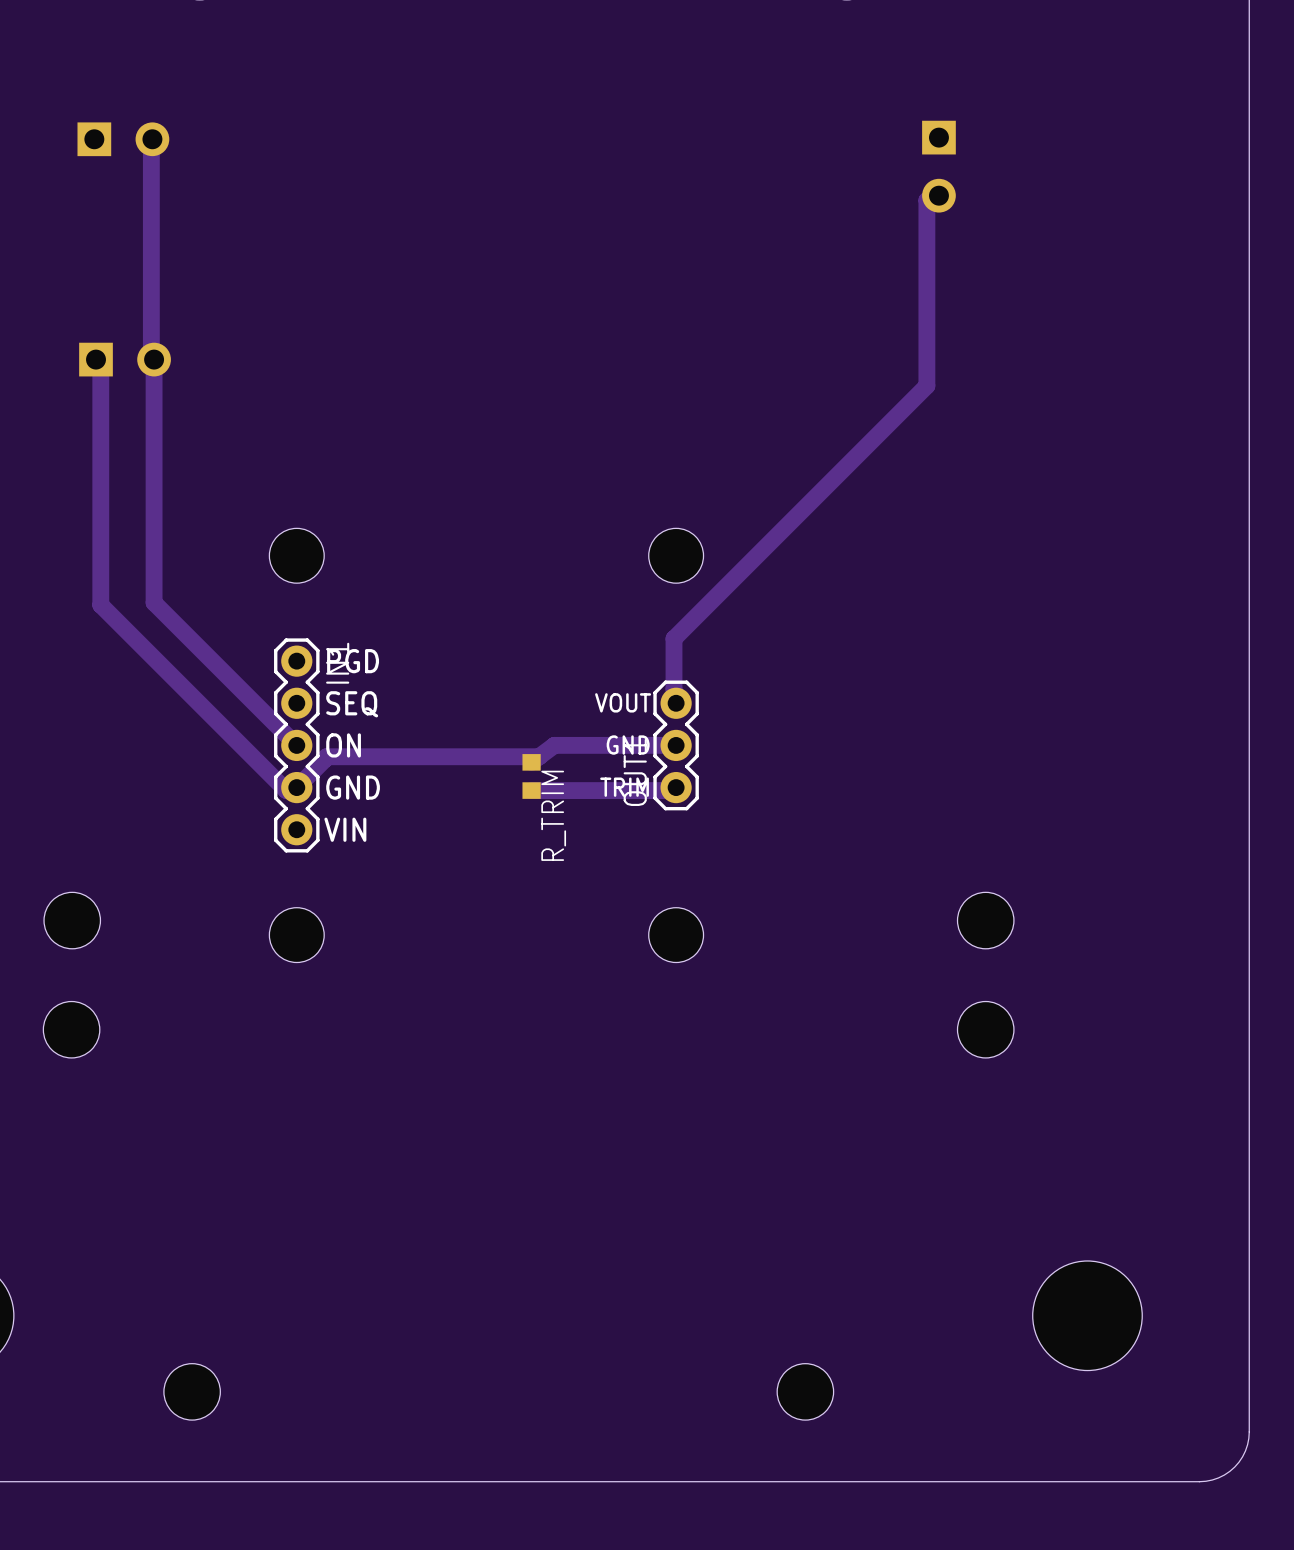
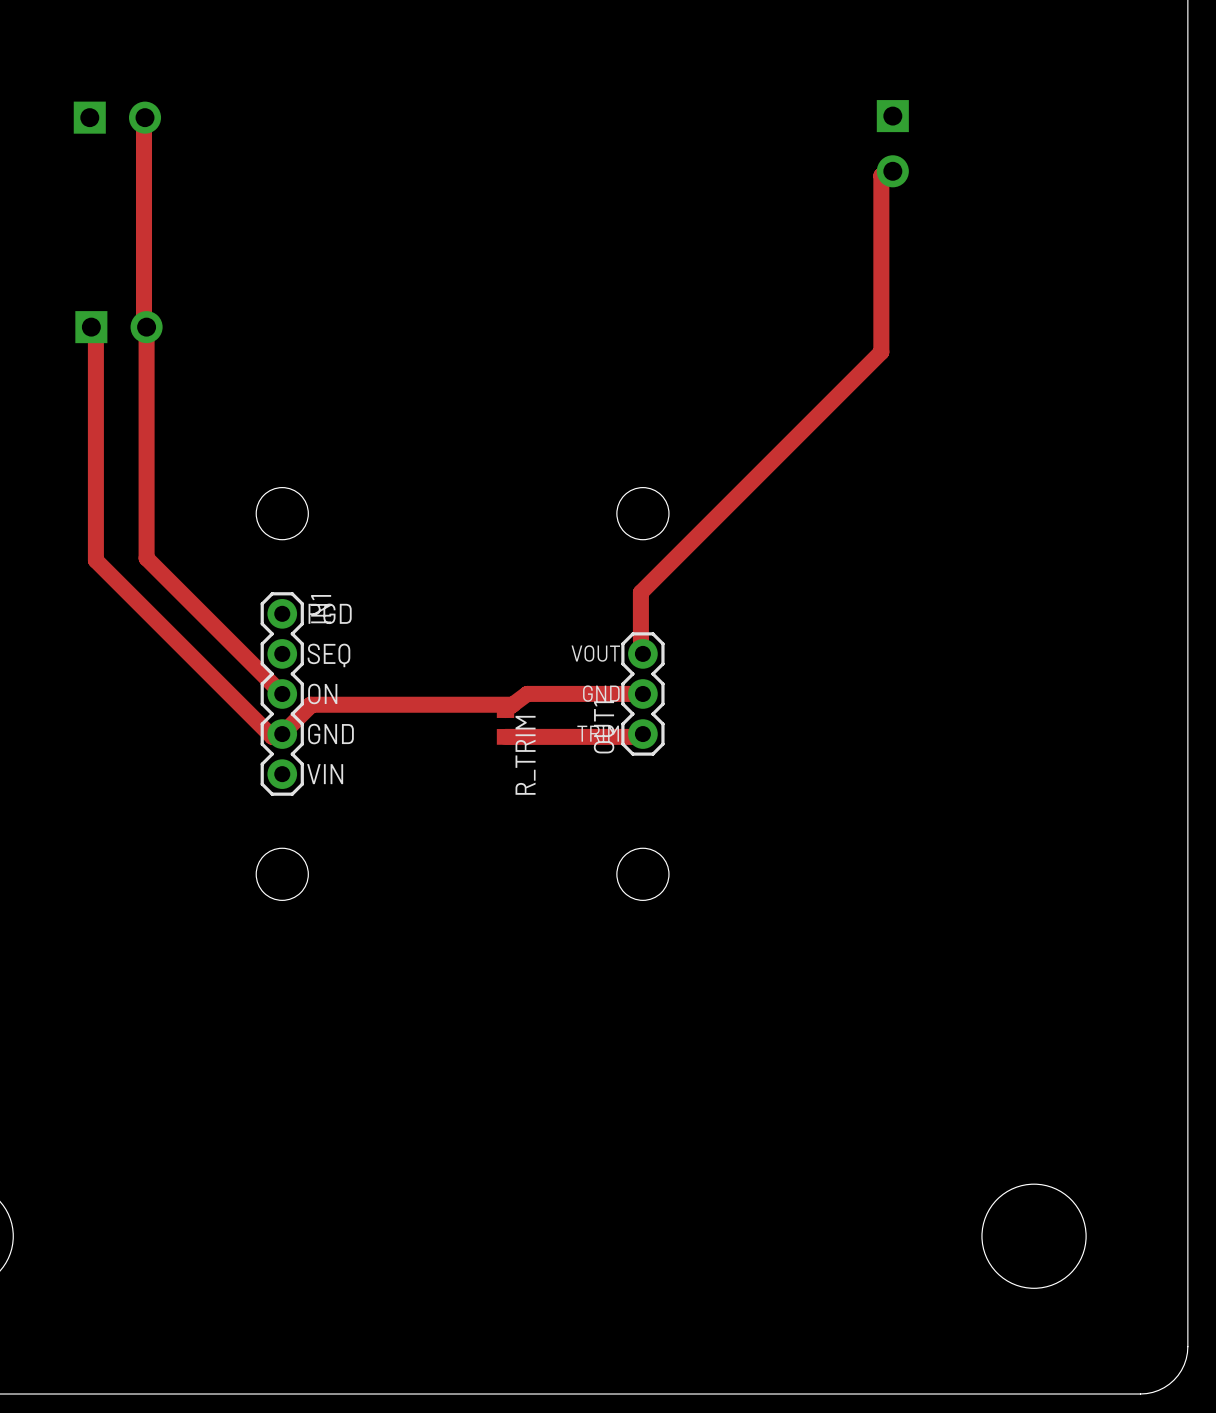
hole: (72, 920) -> none
hole: (985, 920) -> none
hole: (71, 1029) -> none
hole: (985, 1029) -> none
hole: (192, 1391) -> none
hole: (805, 1391) -> none

